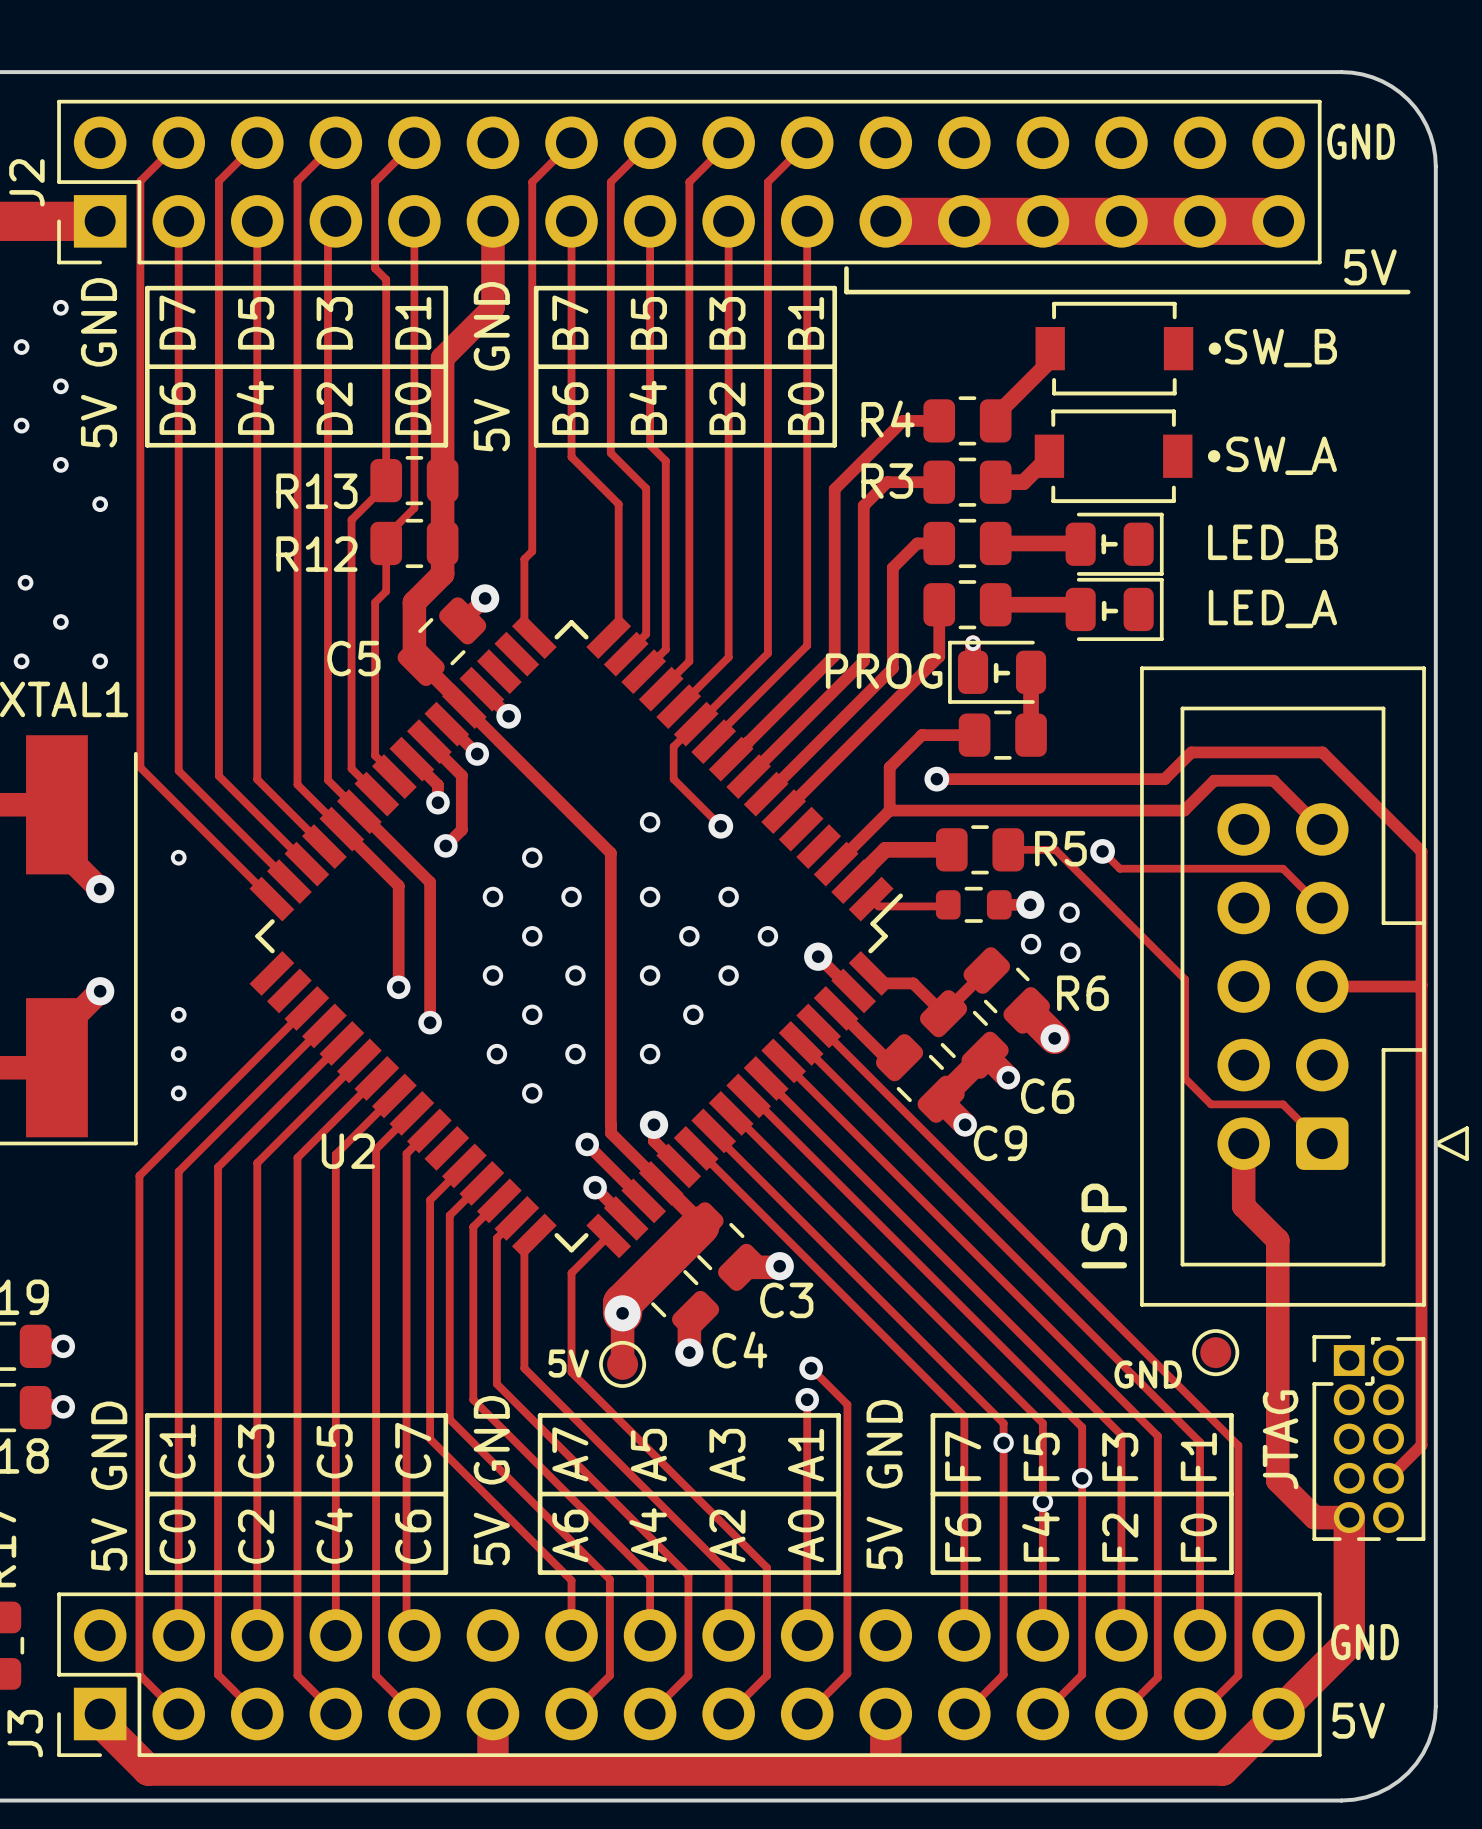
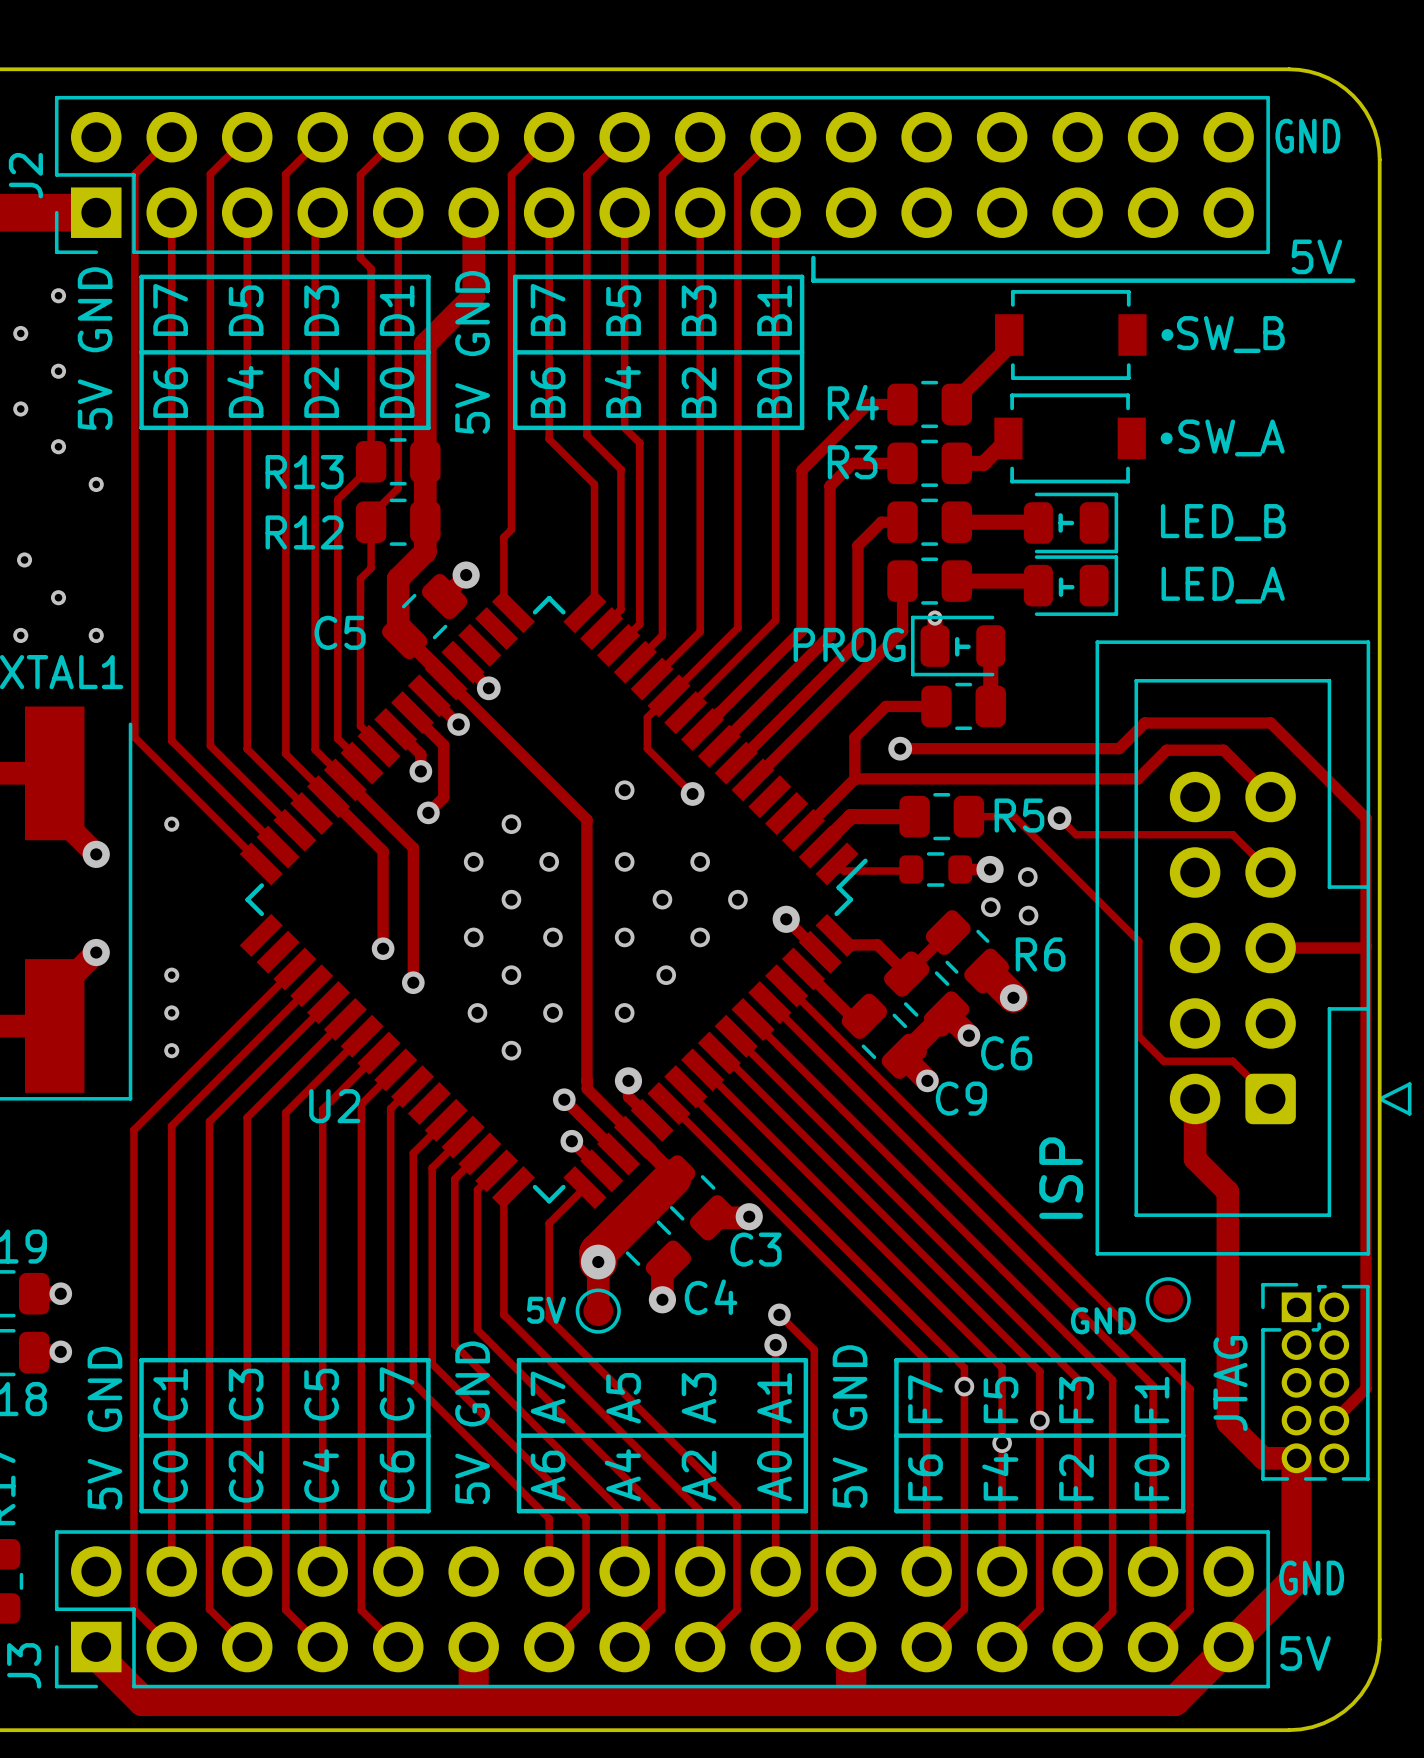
track: (885, 221) (1278, 221) -> none

